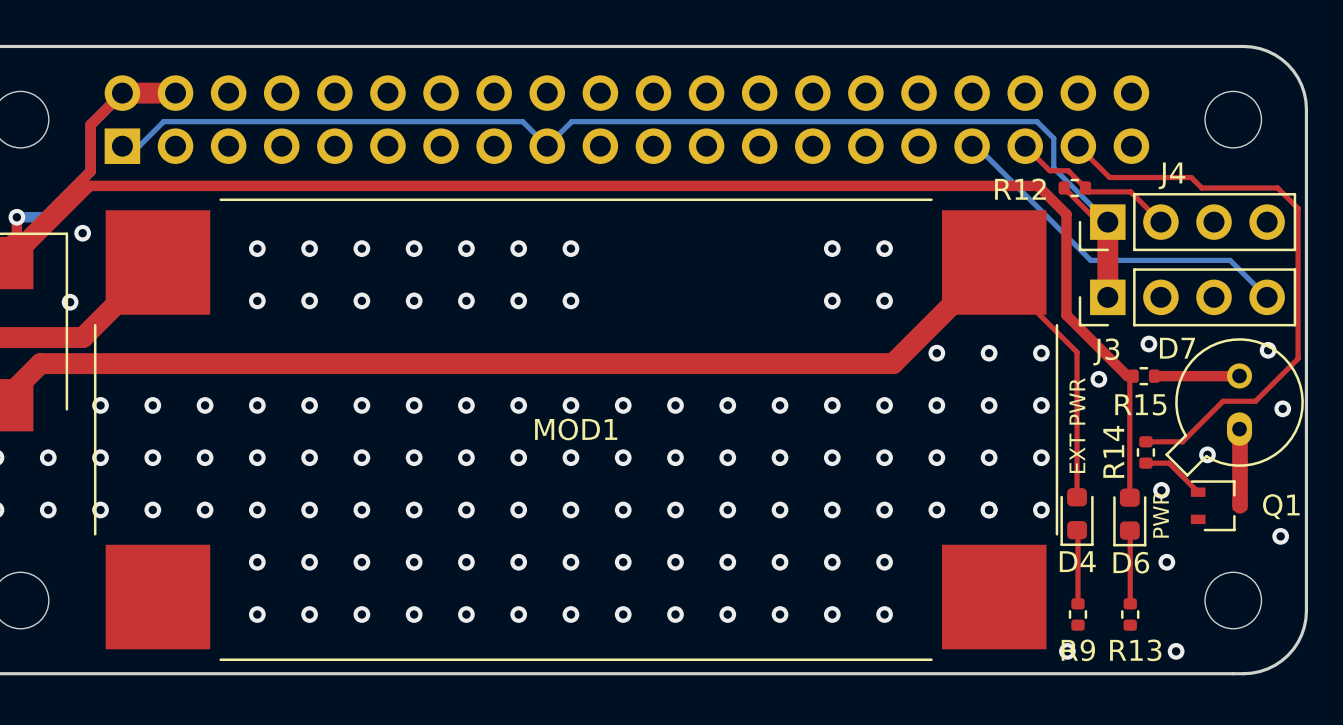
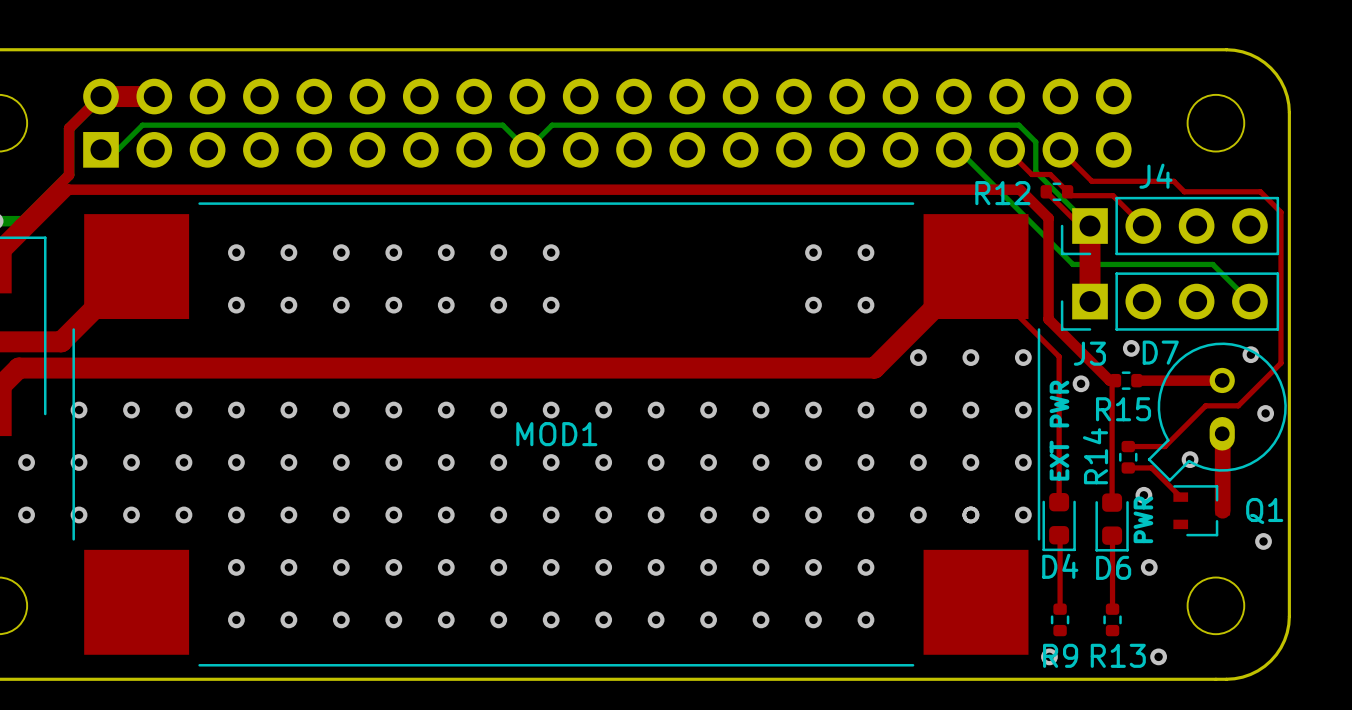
via: (82, 233) -> none
via: (70, 302) -> none

